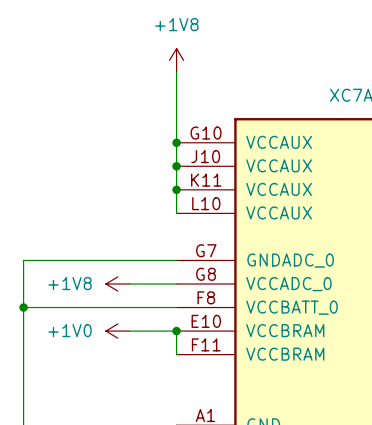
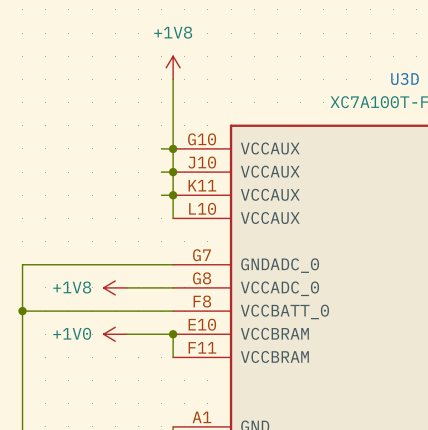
wire: none -> (161, 148) (173, 148)
wire: none -> (161, 172) (173, 172)
wire: none -> (161, 195) (173, 195)

